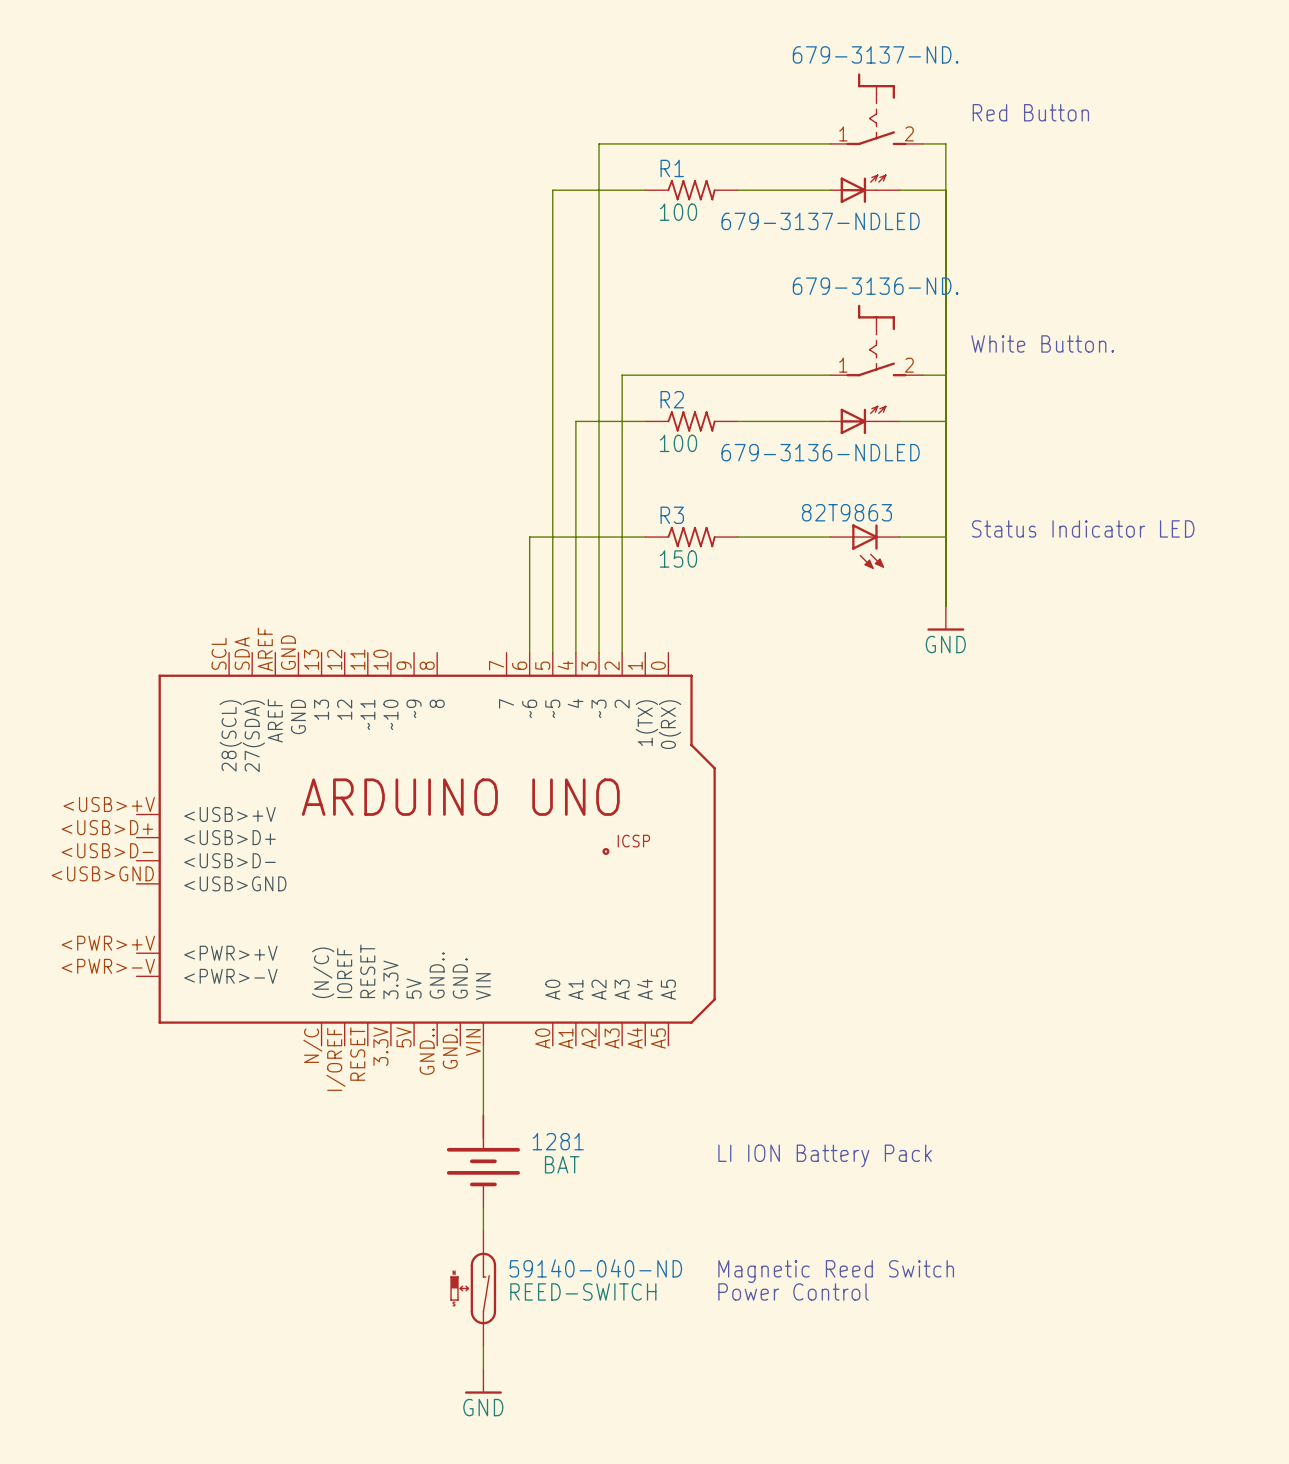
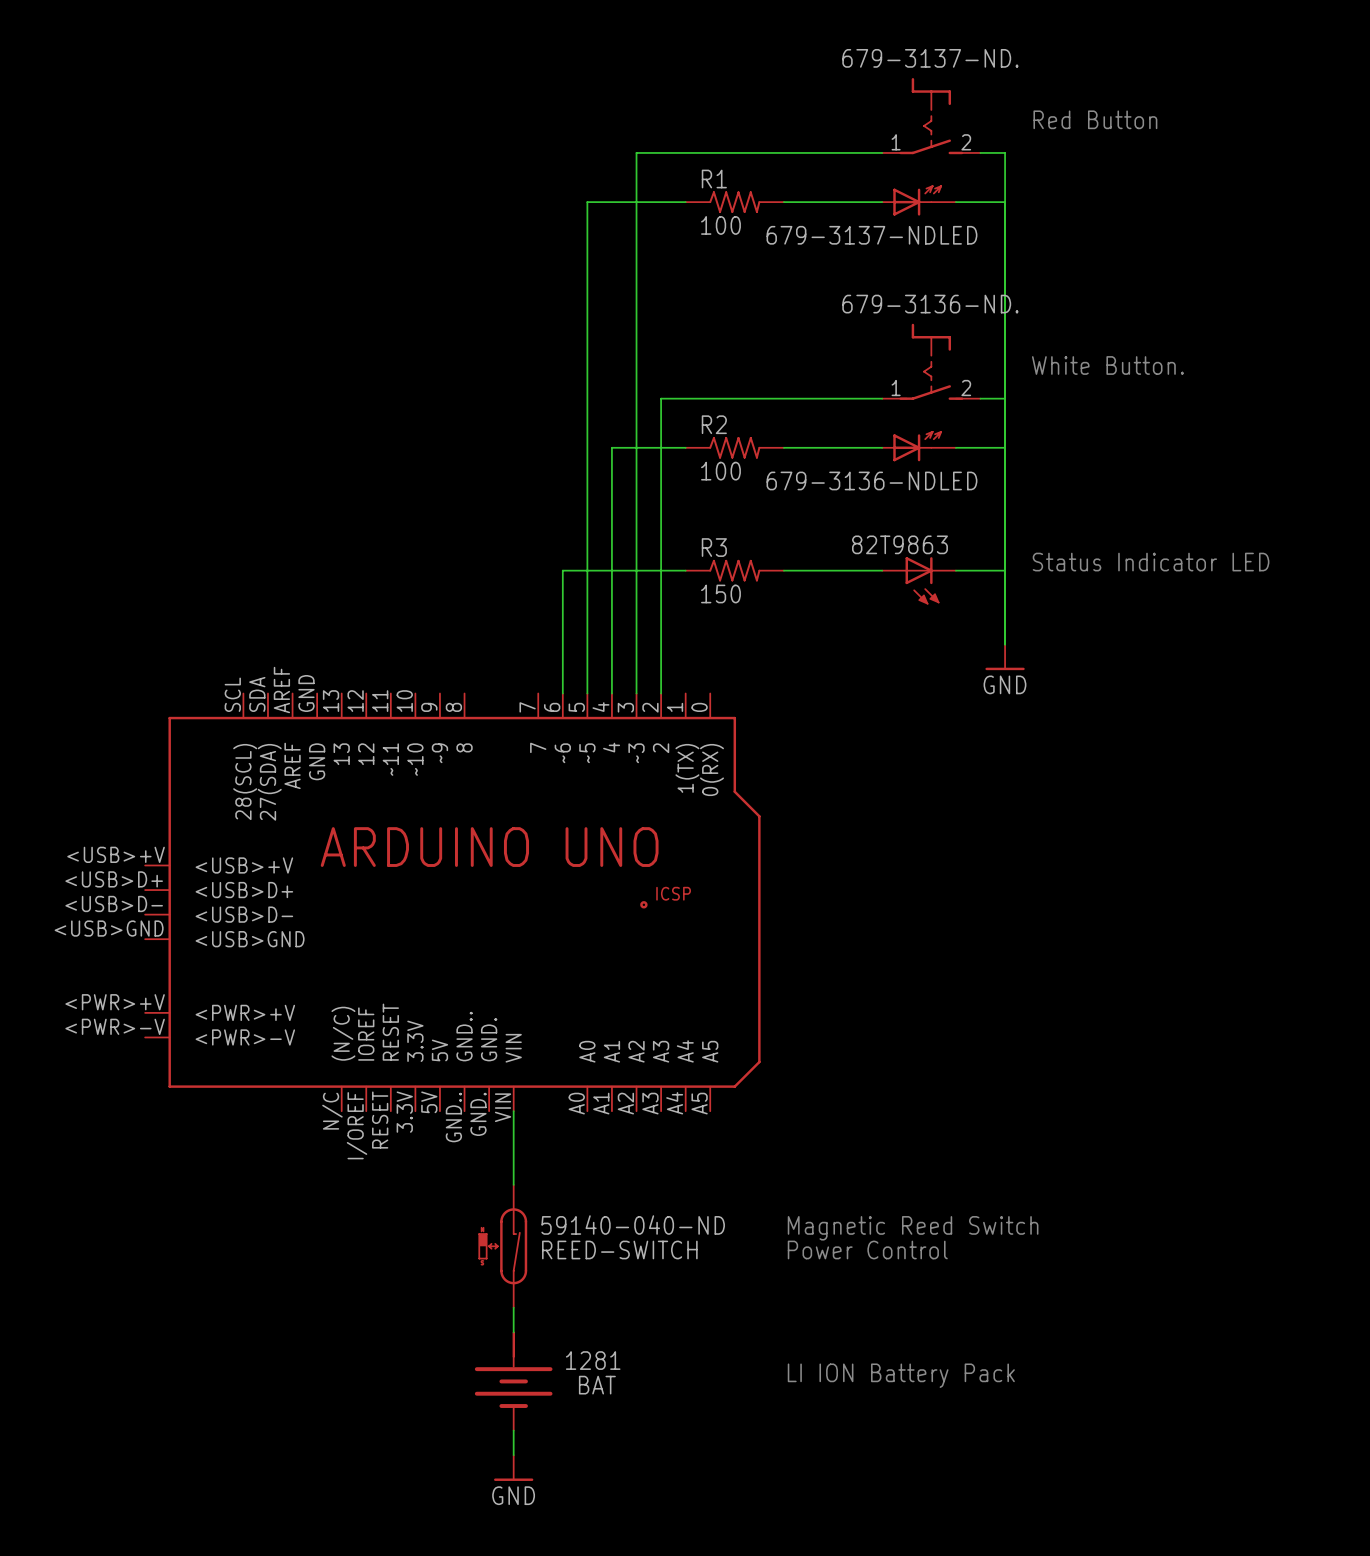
text position: LI ION Battery Pack (825, 1155) -> LI ION Battery Pack (901, 1375)
1281 position: (483, 1161) -> (513, 1381)
text position: Magnetic Reed Switch (836, 1271) -> Magnetic Reed Switch (913, 1228)
59140-040-ND position: (473, 1288) -> (502, 1246)
text position: Power Control (793, 1291) -> Power Control (867, 1249)

